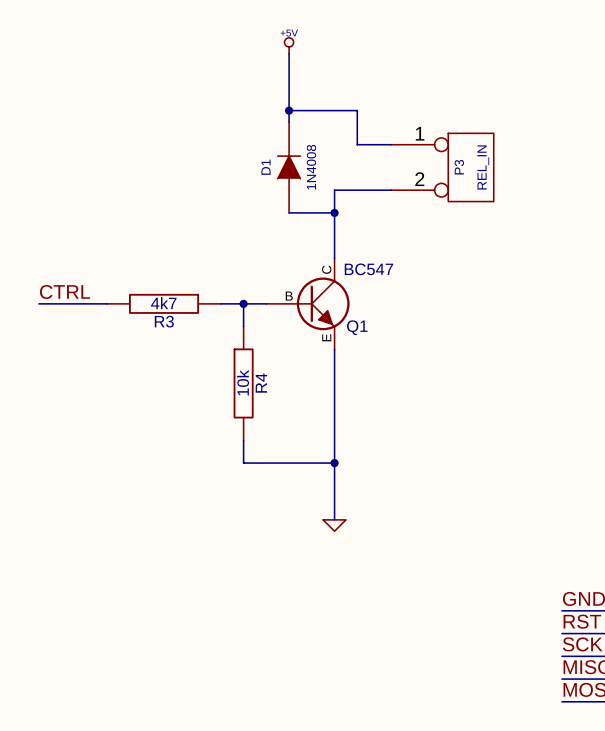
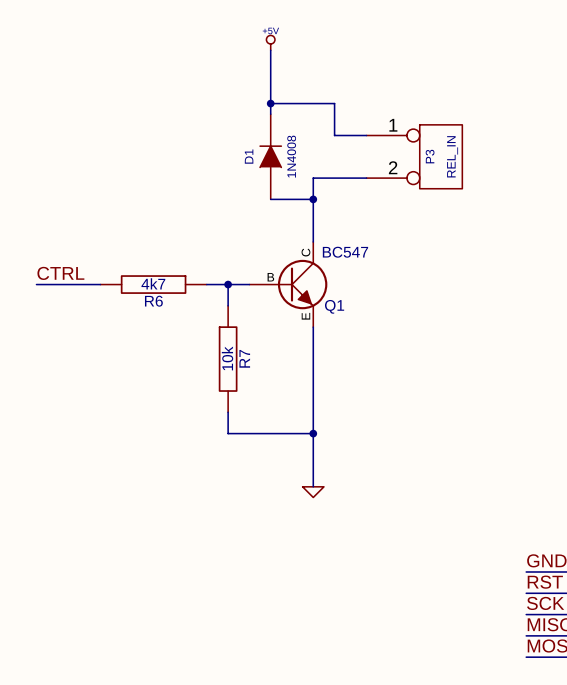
R3 name: R3 (164, 321) -> R6 (153, 301)
R4 name: R4 (261, 383) -> R7 (244, 358)

